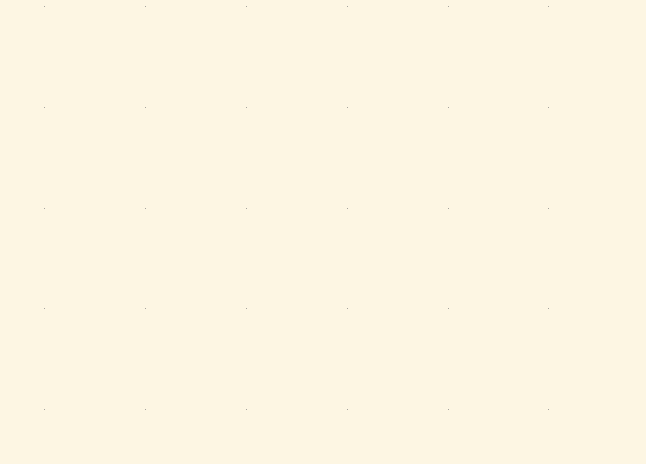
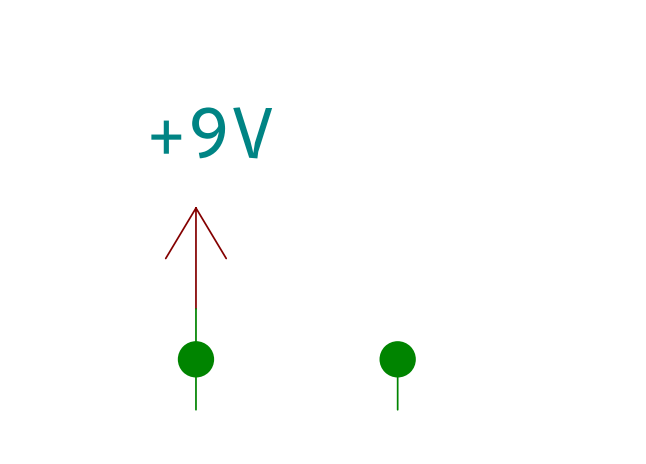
power symbol: none -> +9V (195, 258)
wire: none -> (195, 308) (195, 409)
junction: none -> (195, 359)
wire: none -> (397, 359) (397, 409)
junction: none -> (397, 359)

